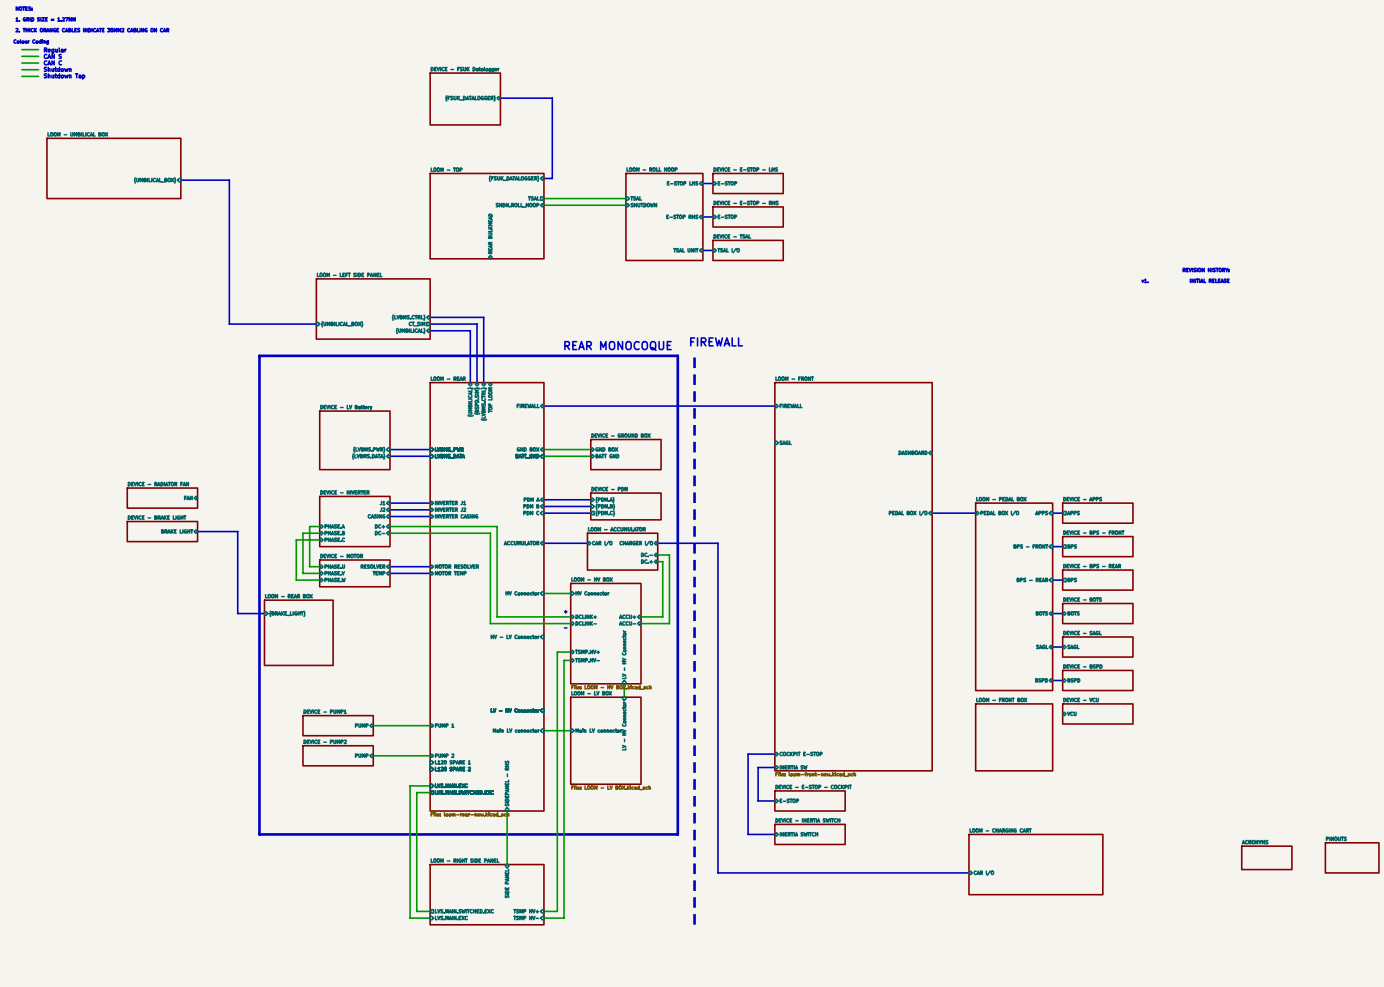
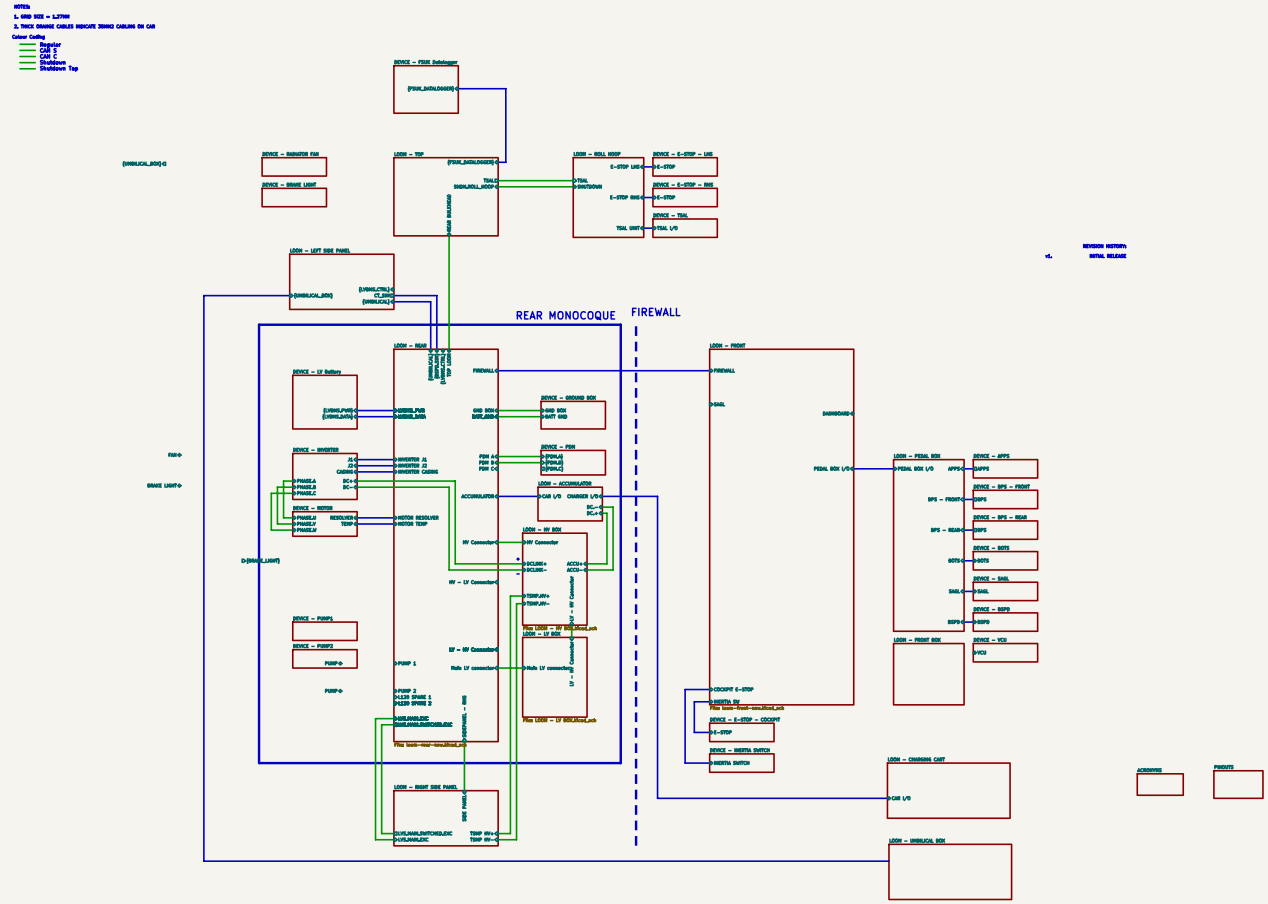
sheet: (113, 168) -> none
bus: (180, 180) (229, 180) (229, 324) -> (888, 861) (203, 861) (203, 295) (209, 295)
sheet: none -> (294, 166)
sheet: none -> (294, 197)
wire: none -> (449, 235) (449, 349)
bus: (430, 317) (483, 317) (483, 382) -> none
line: (282, 355) (259, 355) (259, 834) (282, 834) -> (259, 324) (259, 763)
sheet: (162, 498) -> none
bus: (543, 499) (590, 499) -> none
bus: (543, 506) (590, 506) -> none
bus: (543, 513) (590, 513) -> none
sheet: (162, 531) -> none
bus: (197, 531) (237, 531) (237, 613) (264, 613) -> none
sheet: (298, 632) -> none
sheet position: (338, 725) -> (324, 631)
wire: (373, 725) (430, 725) -> none
sheet position: (338, 755) -> (324, 658)
wire: (373, 755) (430, 755) -> none
sheet: none -> (950, 871)

